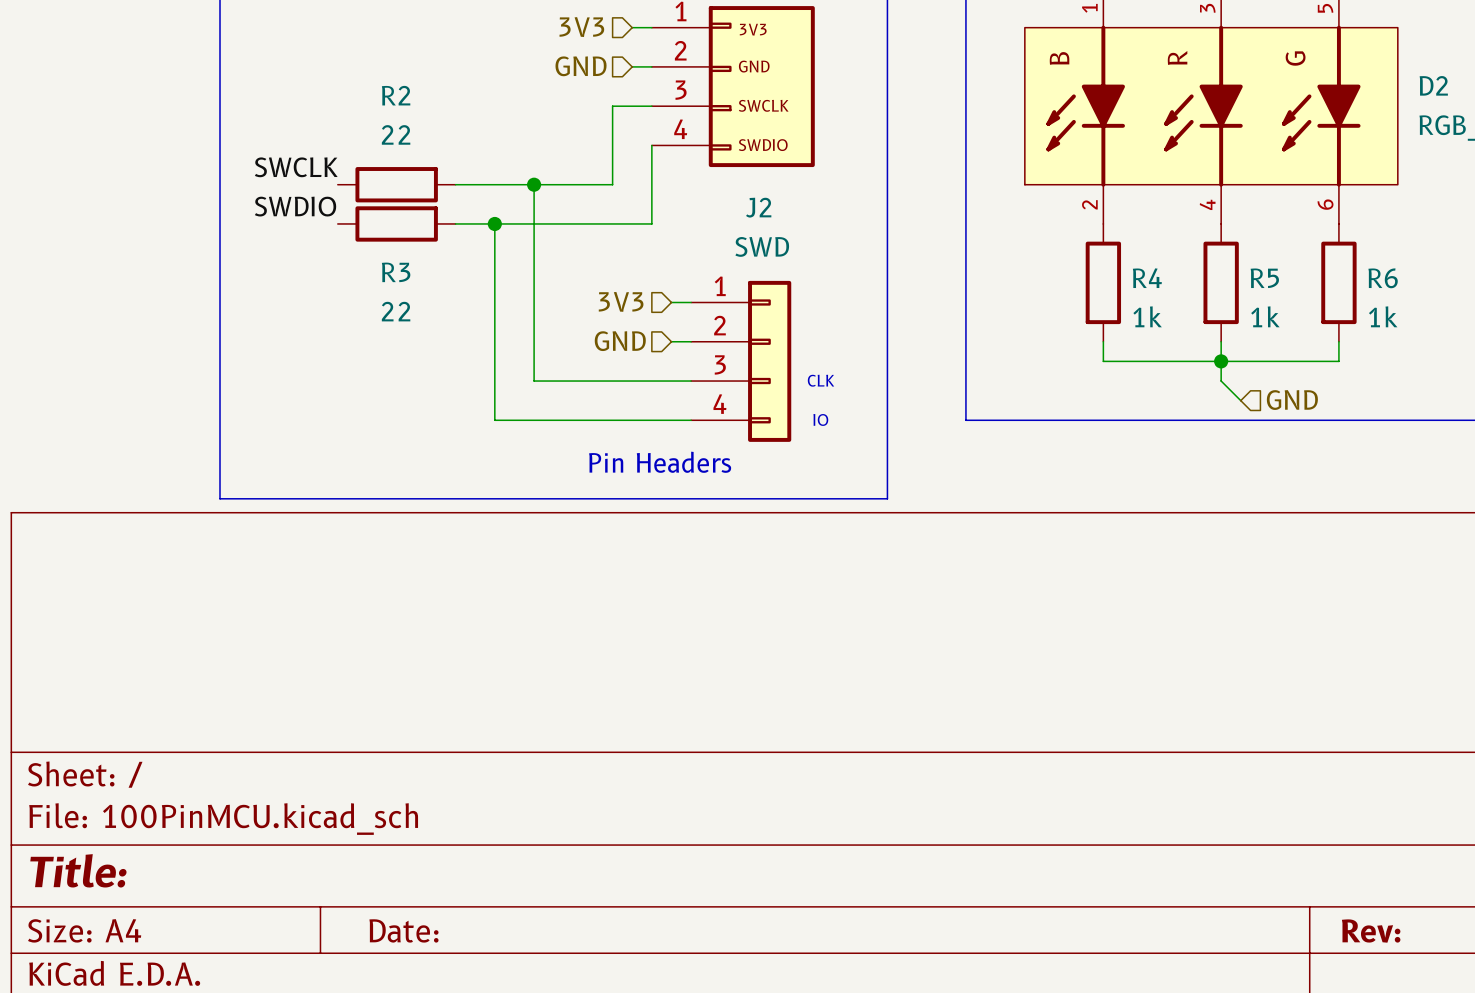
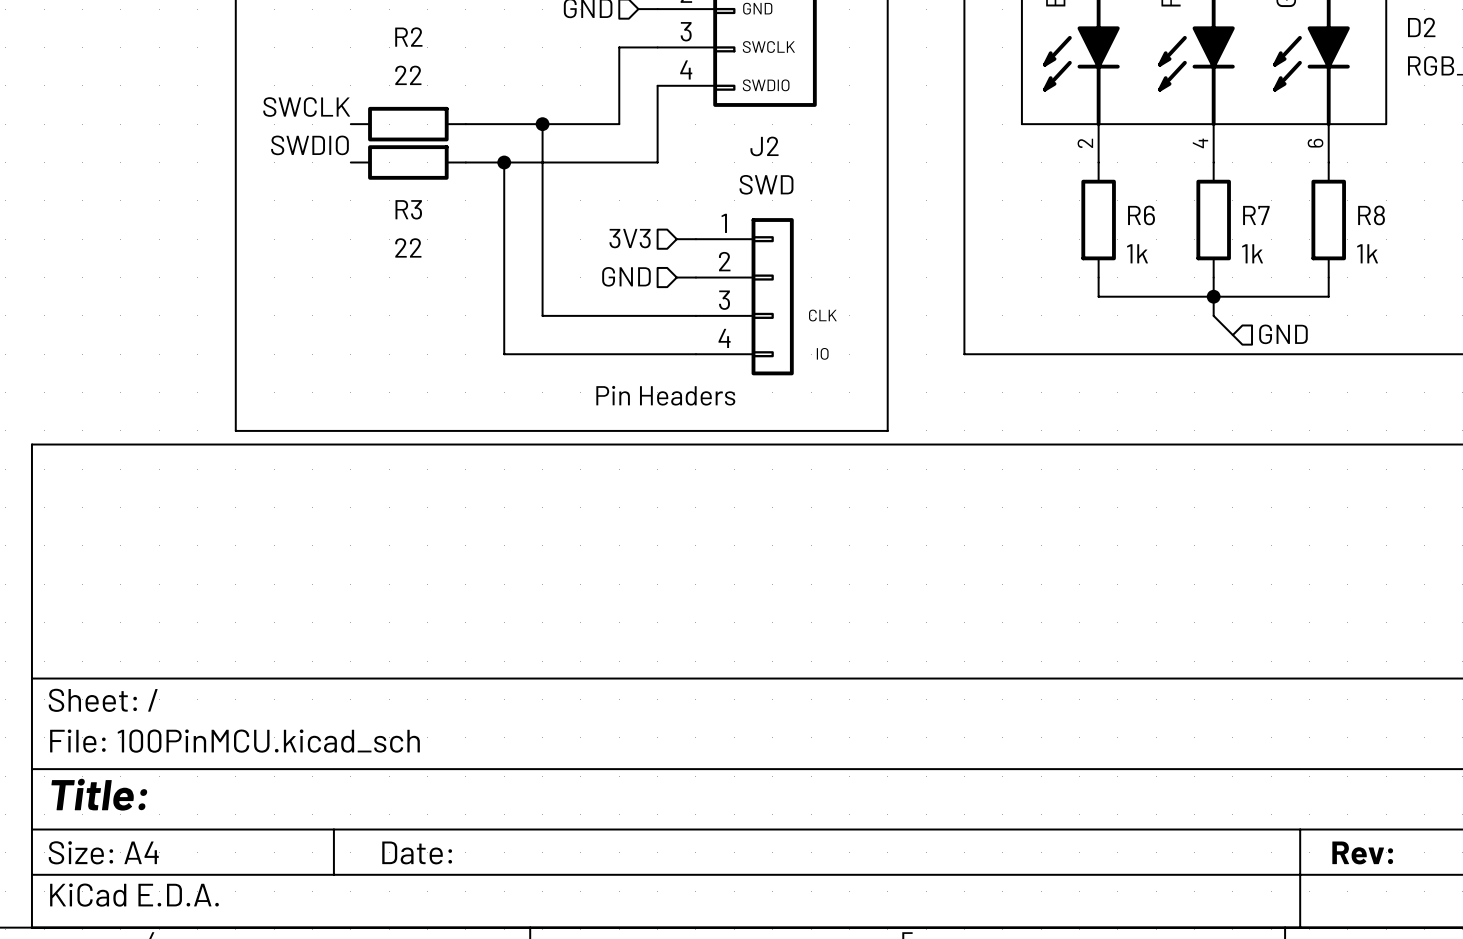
R4 name: R4 (1147, 278) -> R6 (1141, 215)
R5 name: R5 (1264, 278) -> R7 (1256, 215)
R6 name: R6 (1383, 278) -> R8 (1371, 215)

